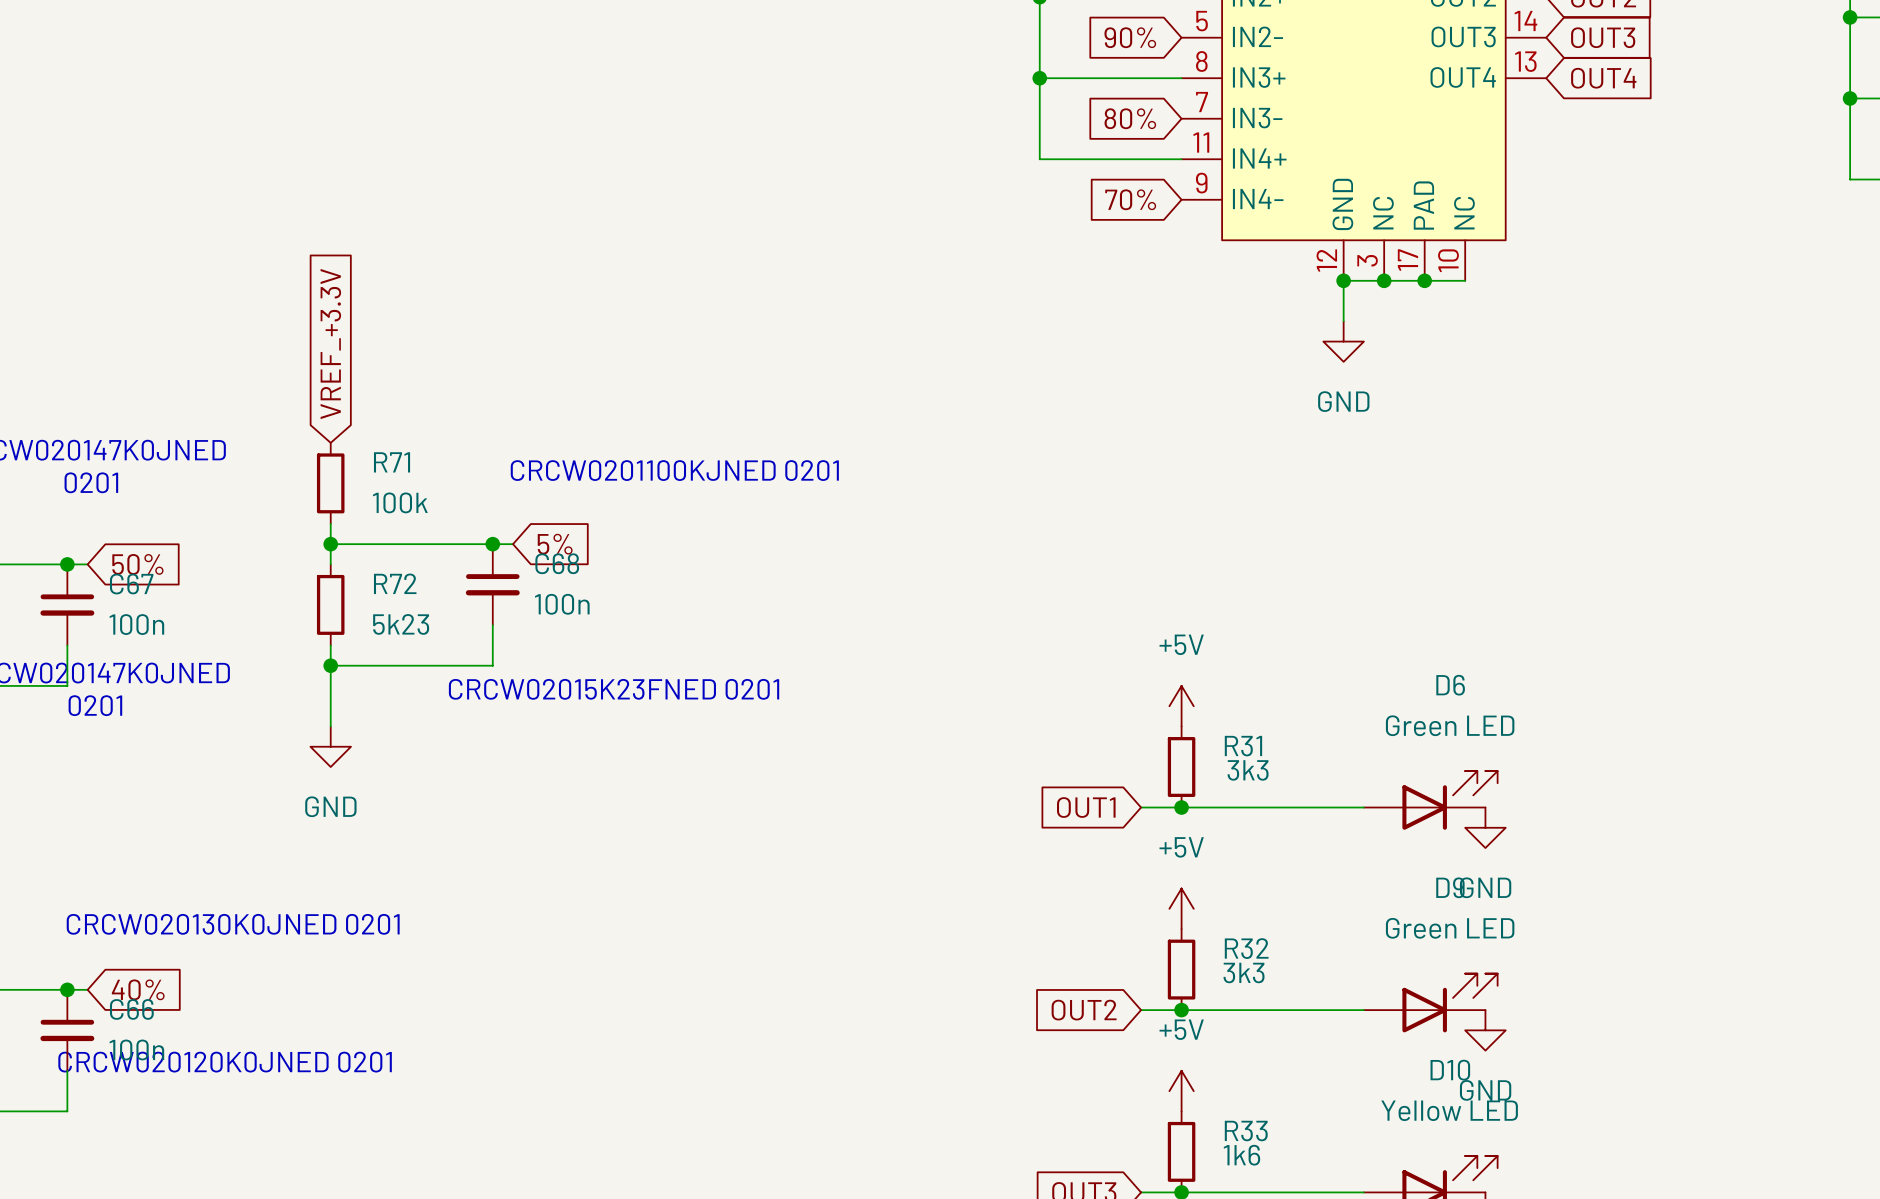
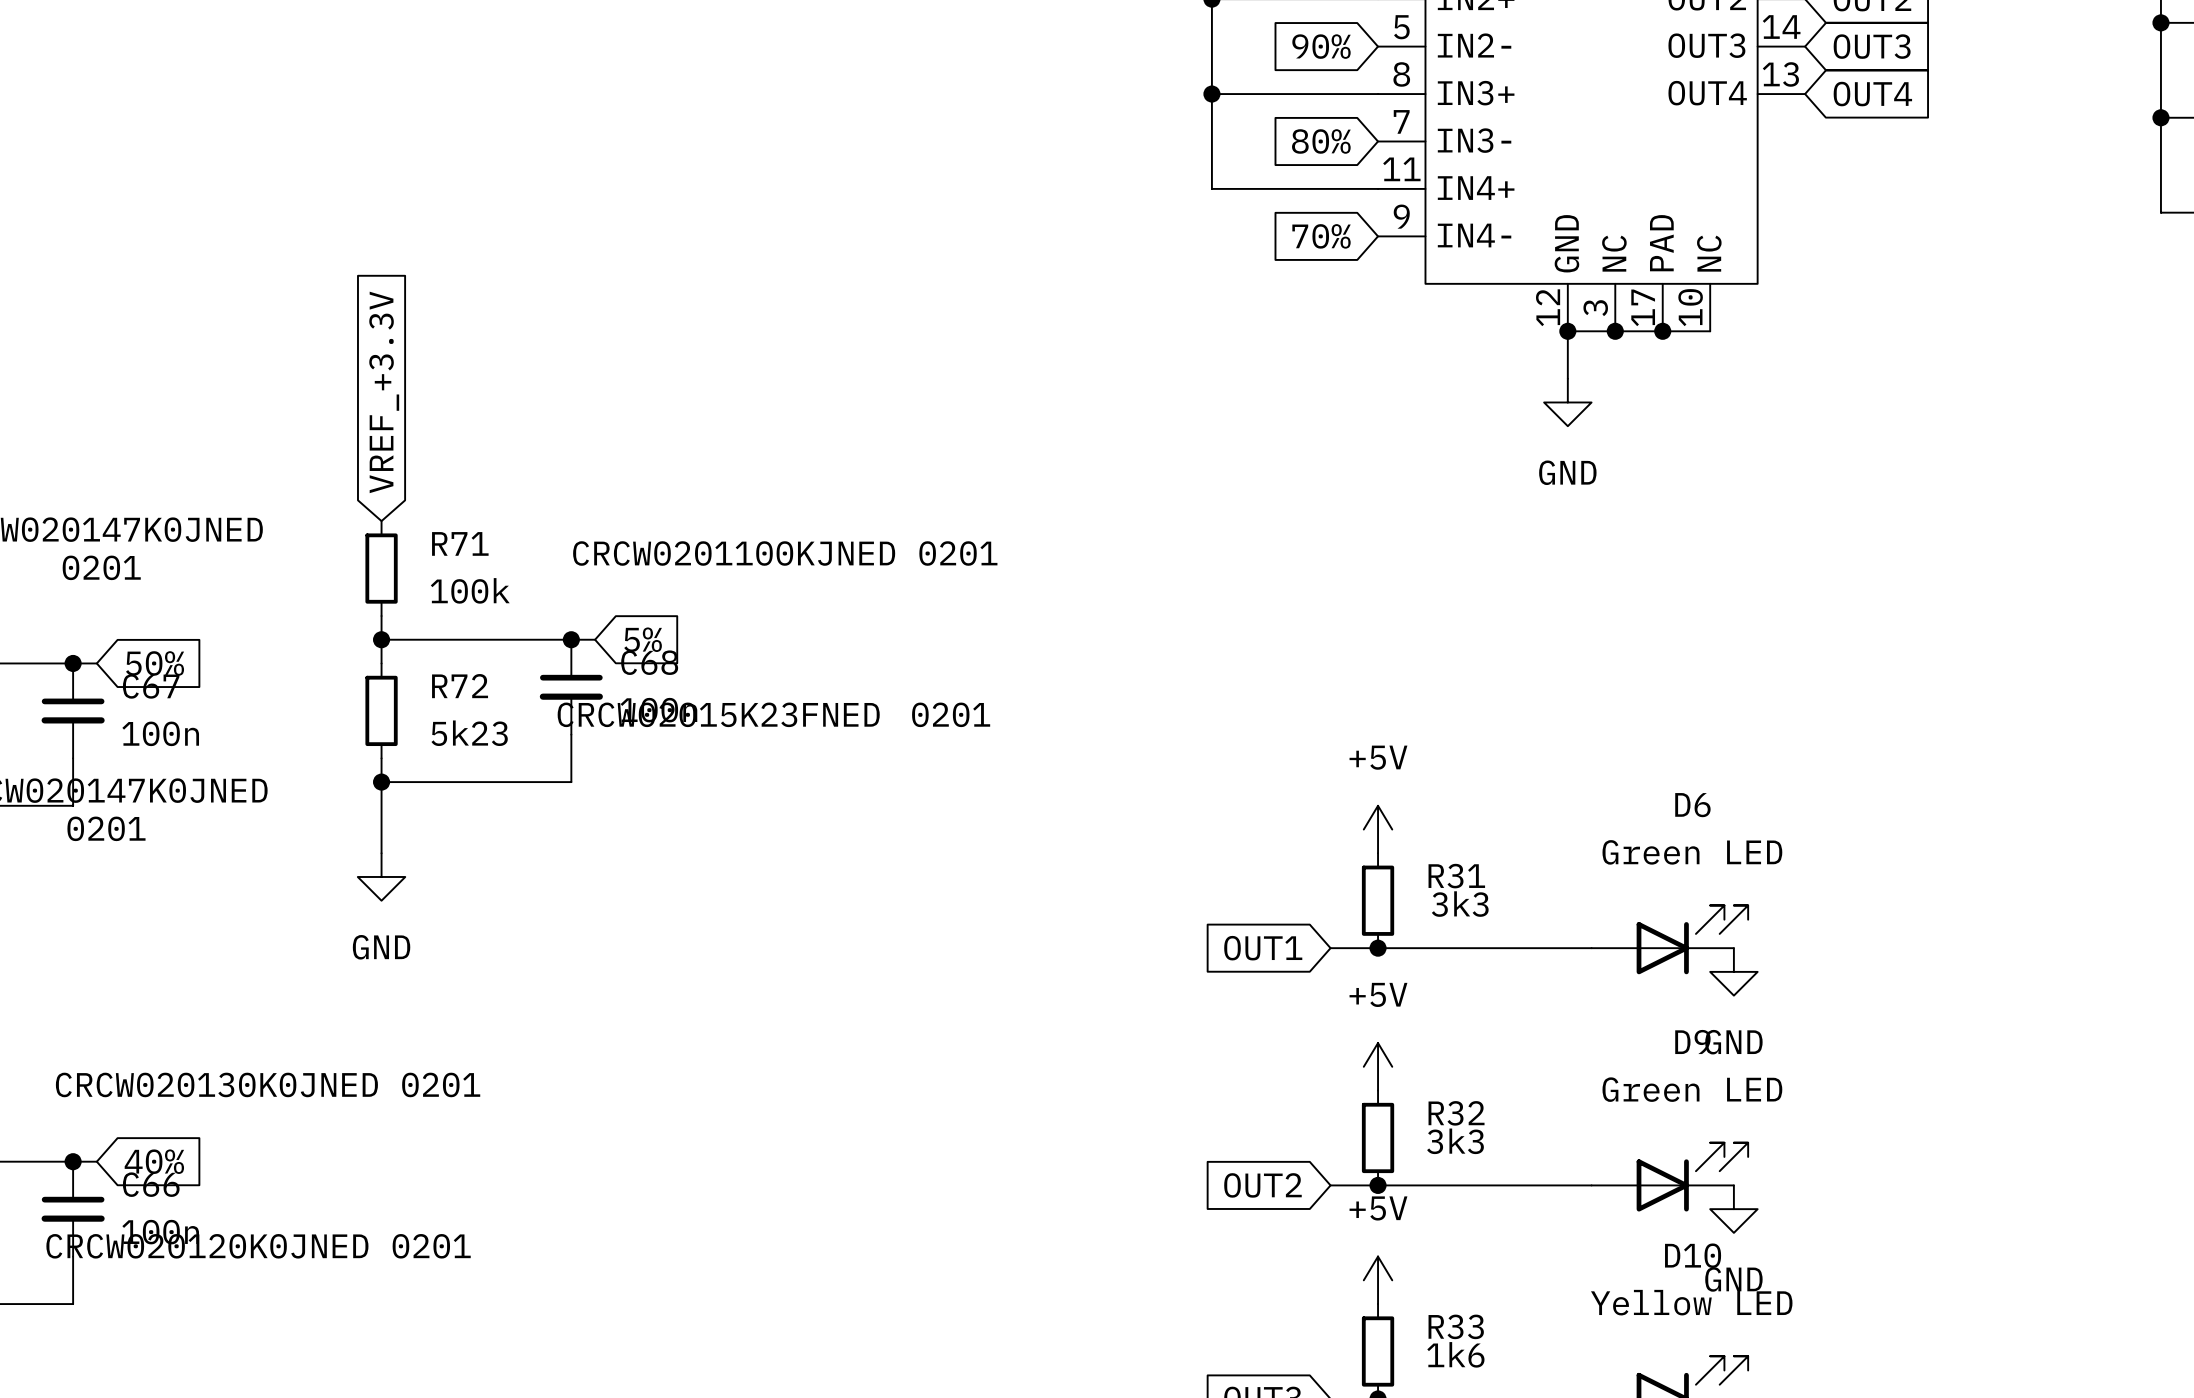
text: none -> CRCW02015K23FNED (718, 714)
text: none -> 0201 (951, 714)
text: CRCW02015K23FNED 0201 (614, 689) -> none

